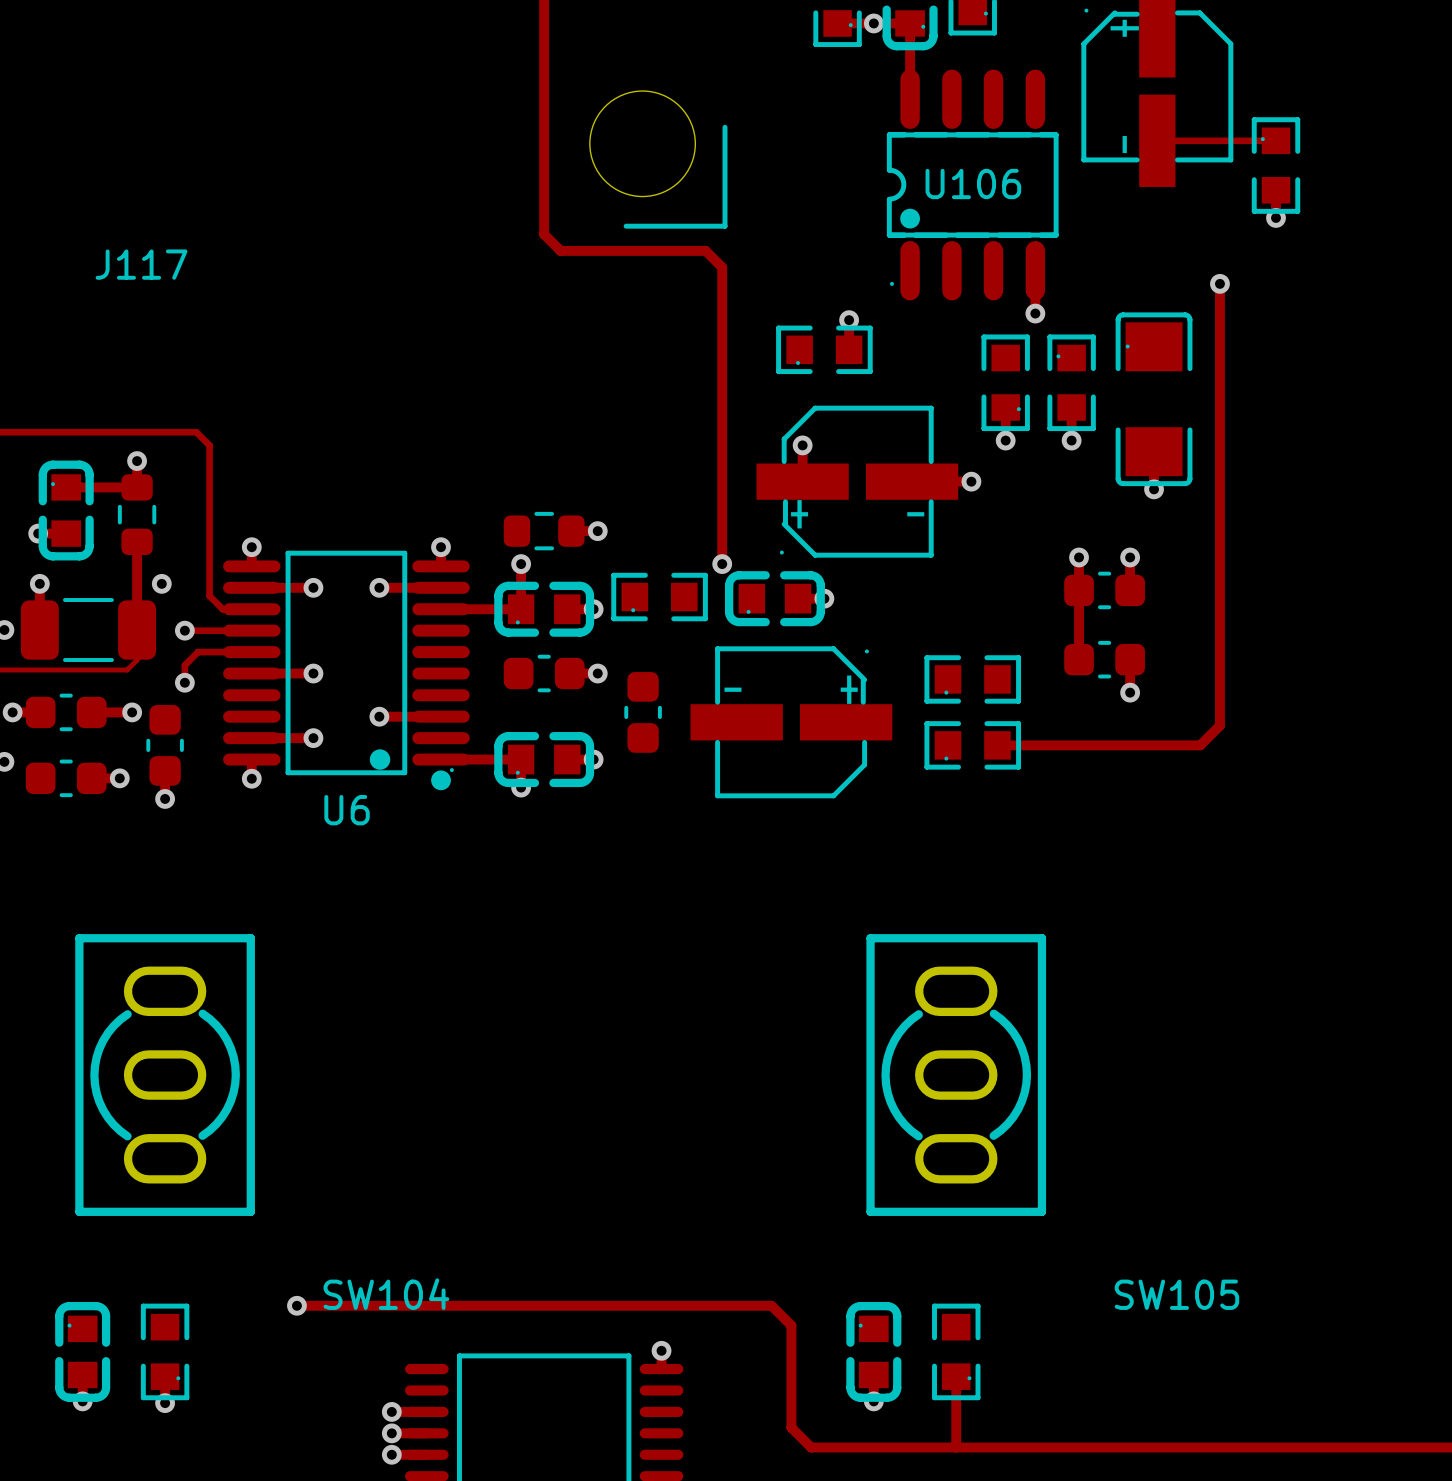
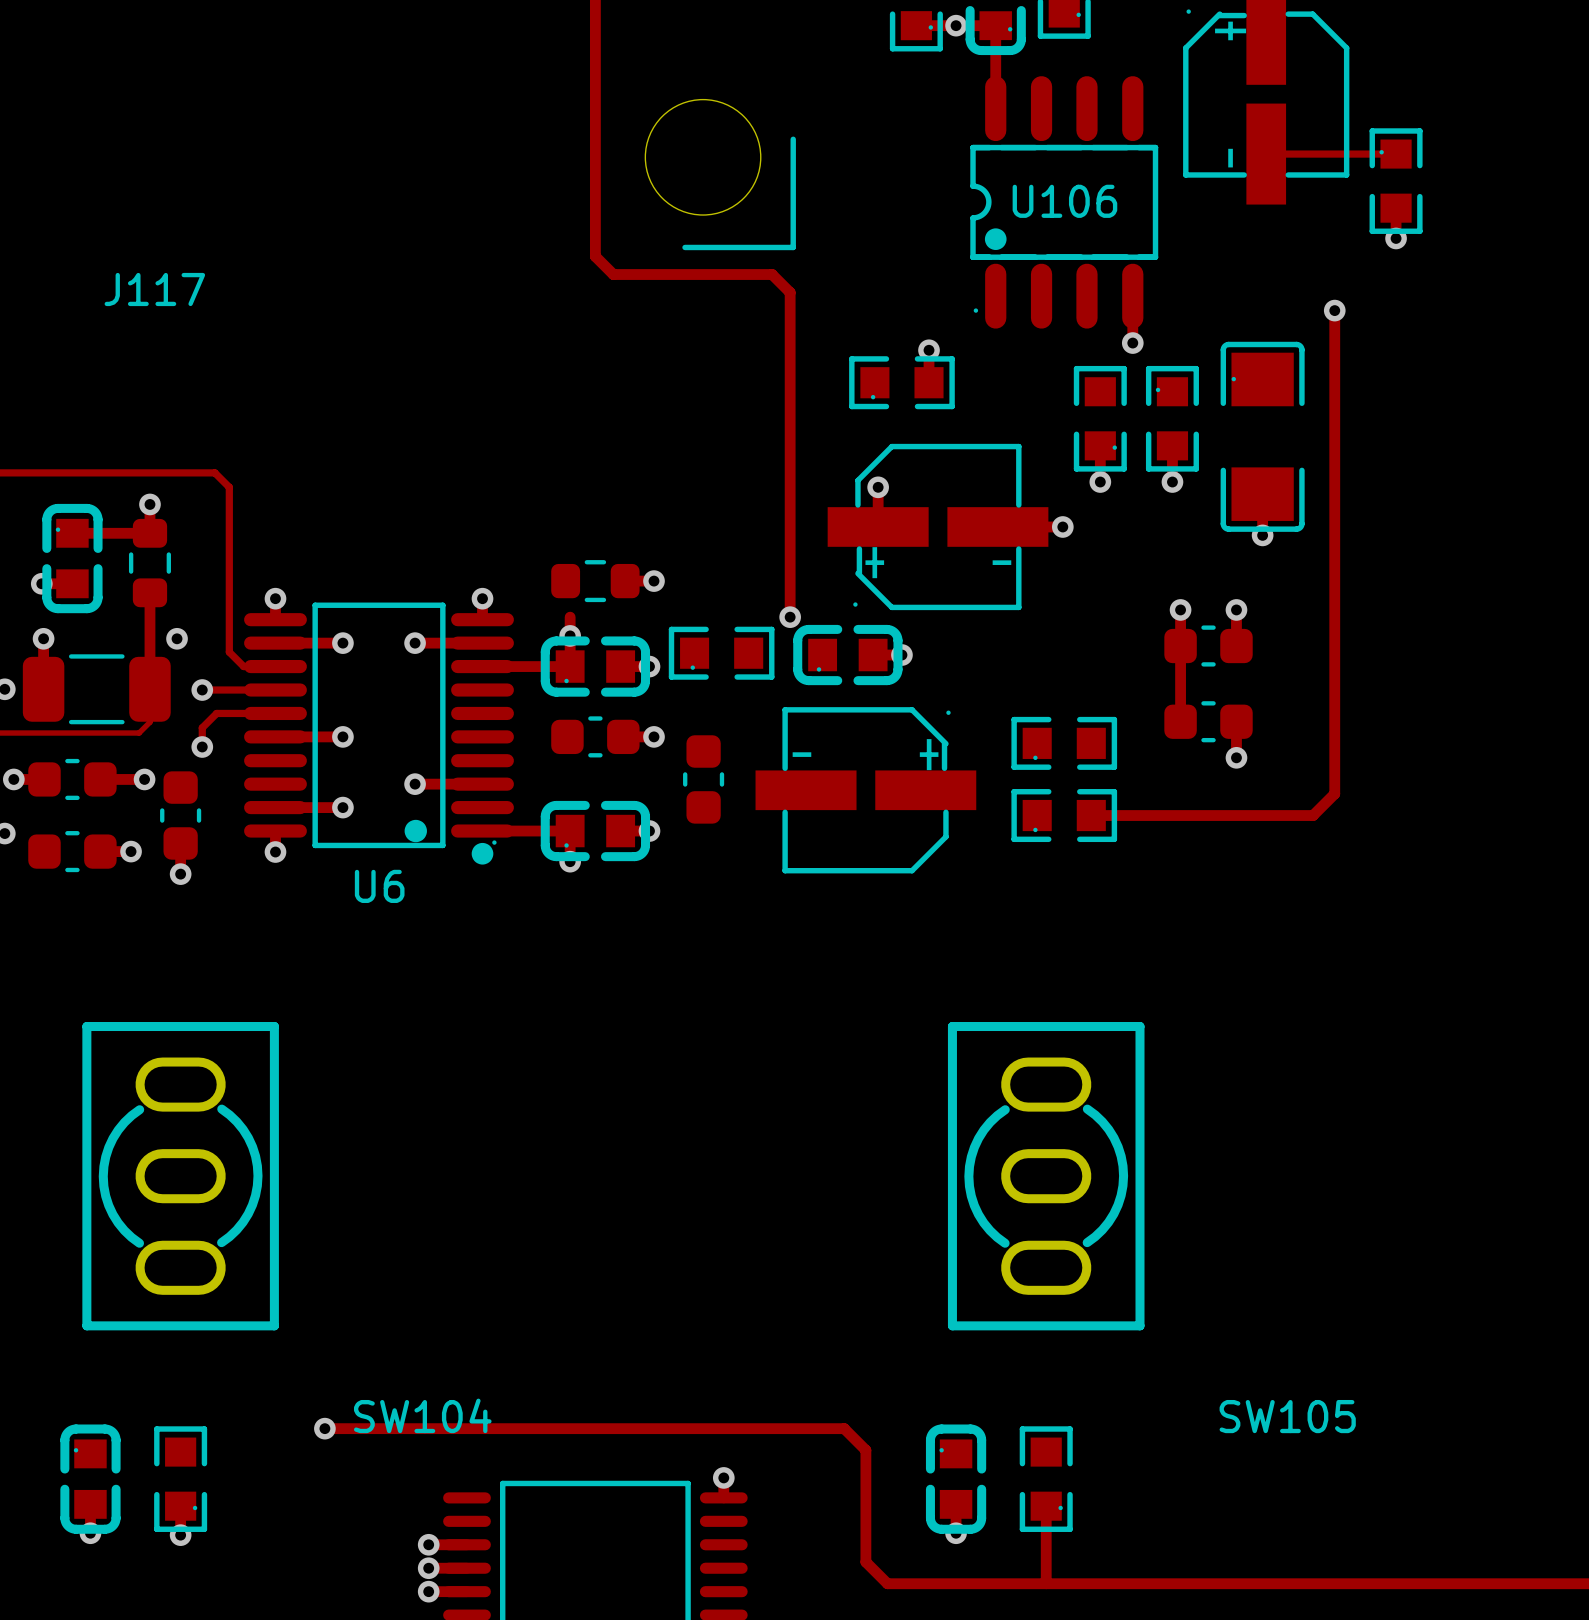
via position: (521, 564) -> (570, 635)

